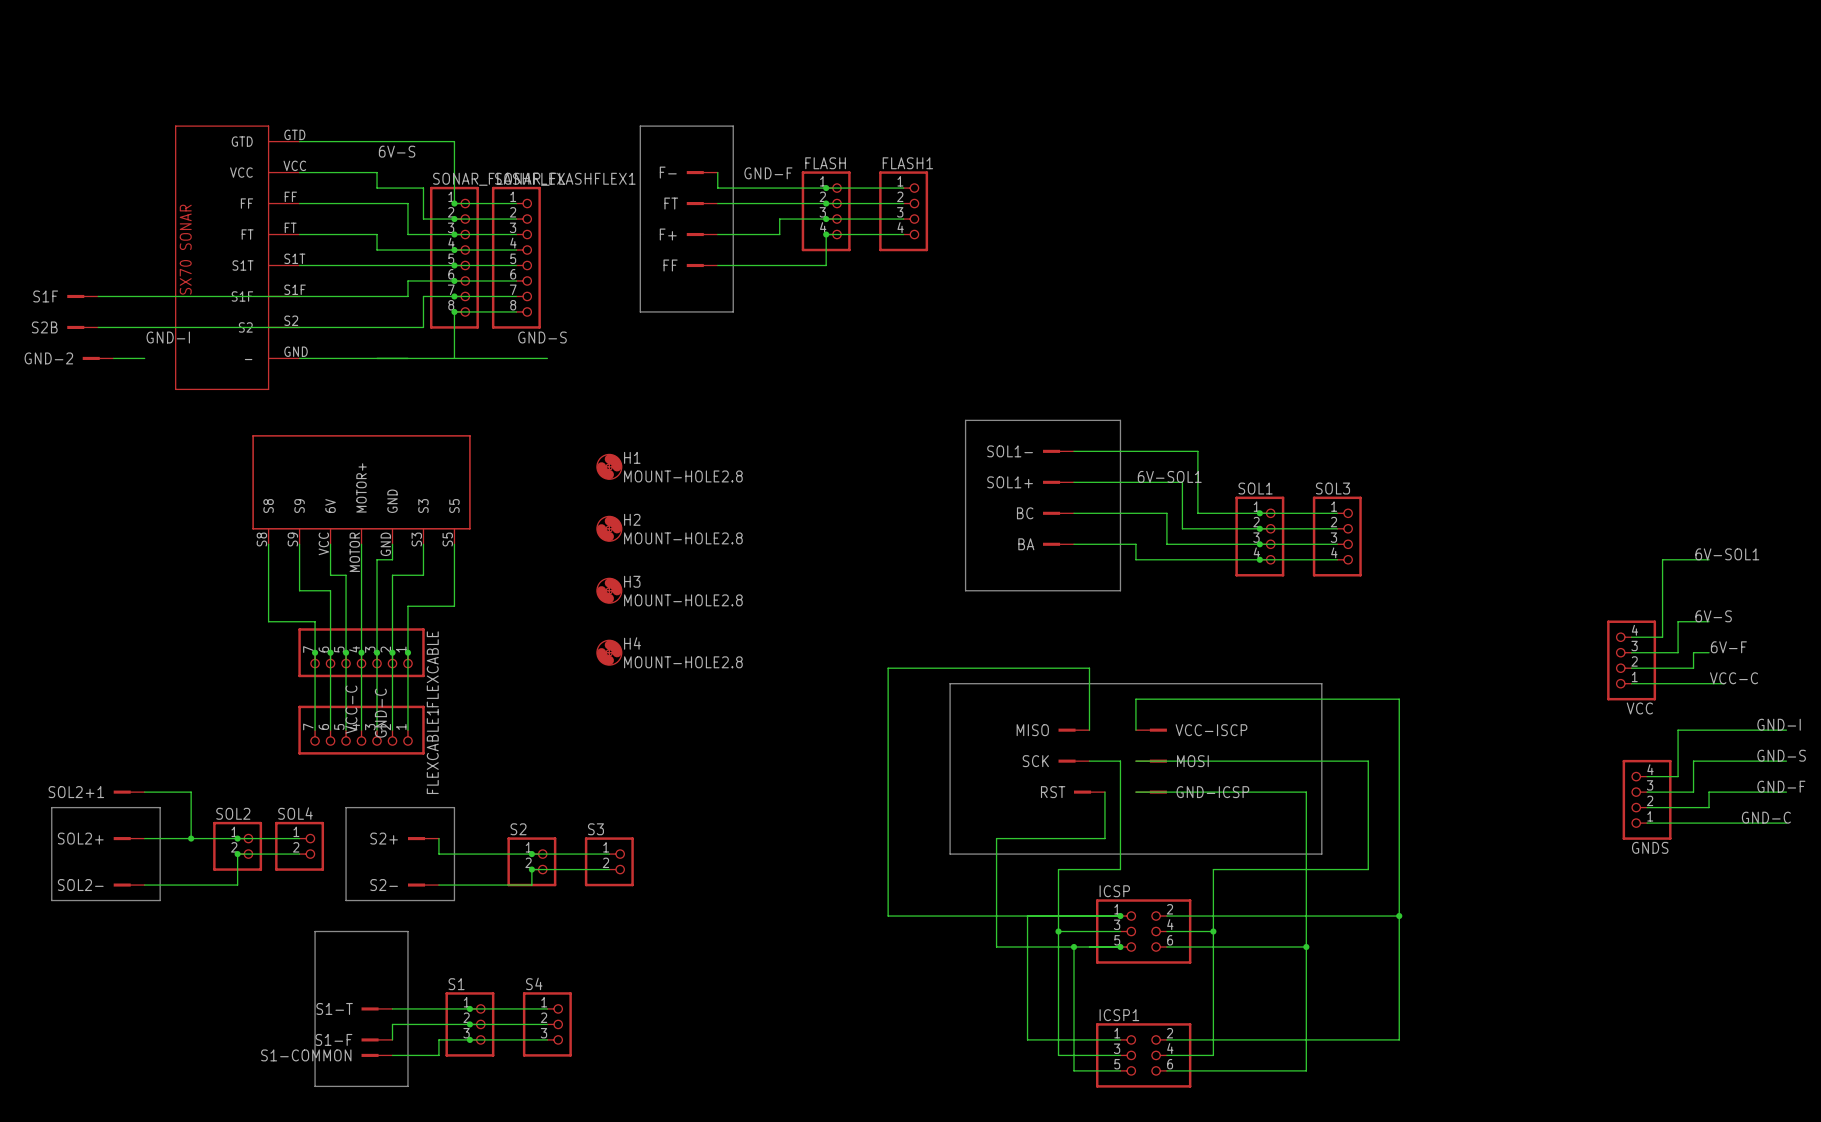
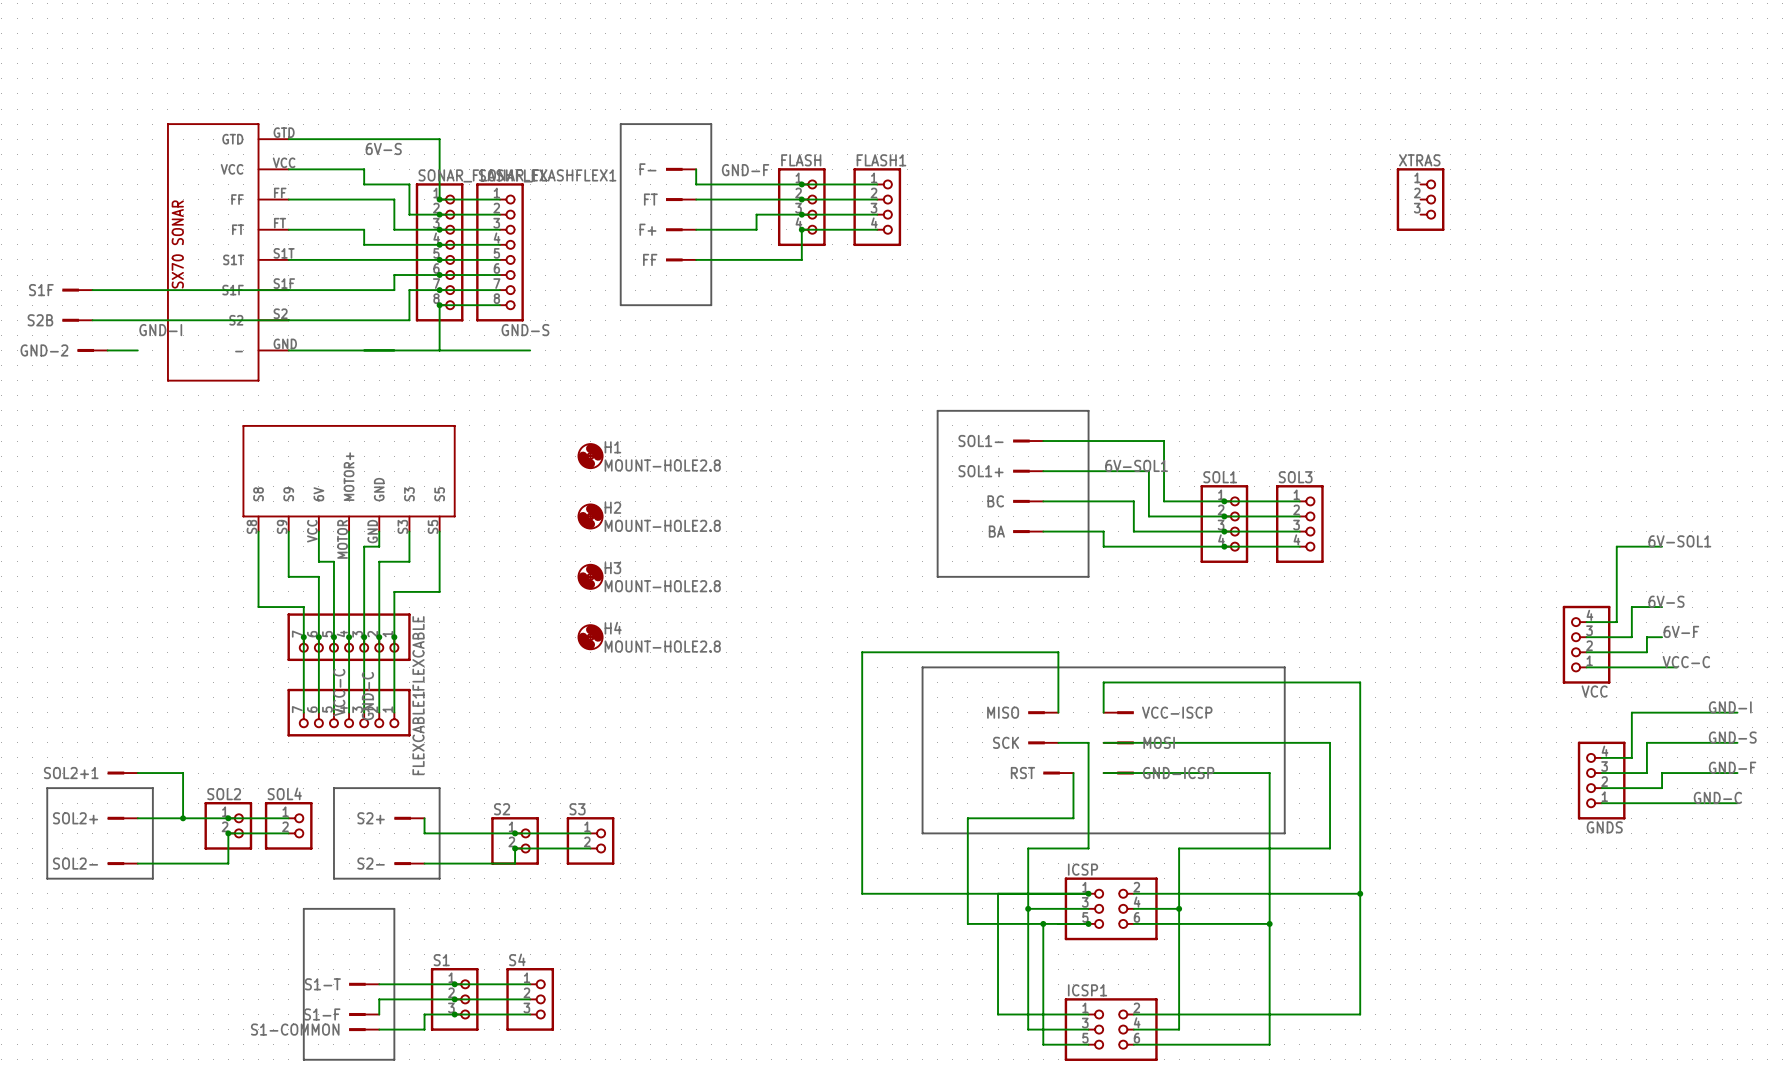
XTRAS: none -> (1420, 199)

